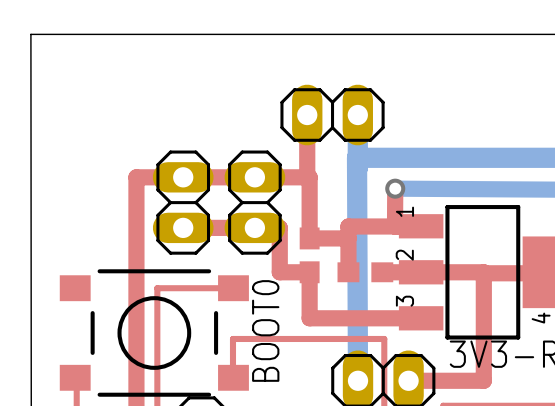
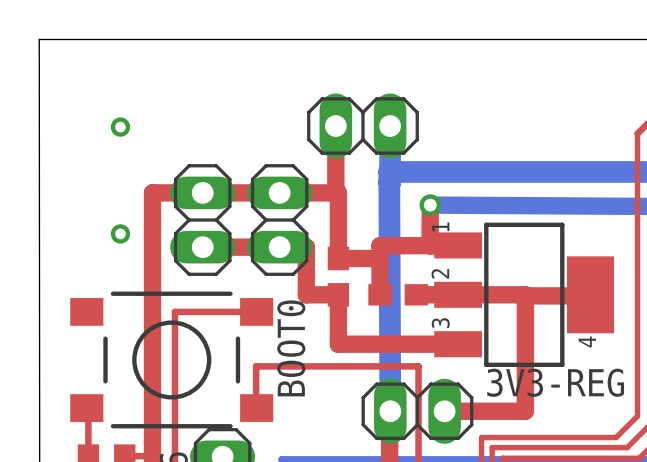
via: none -> (120, 127)
via: none -> (120, 233)

